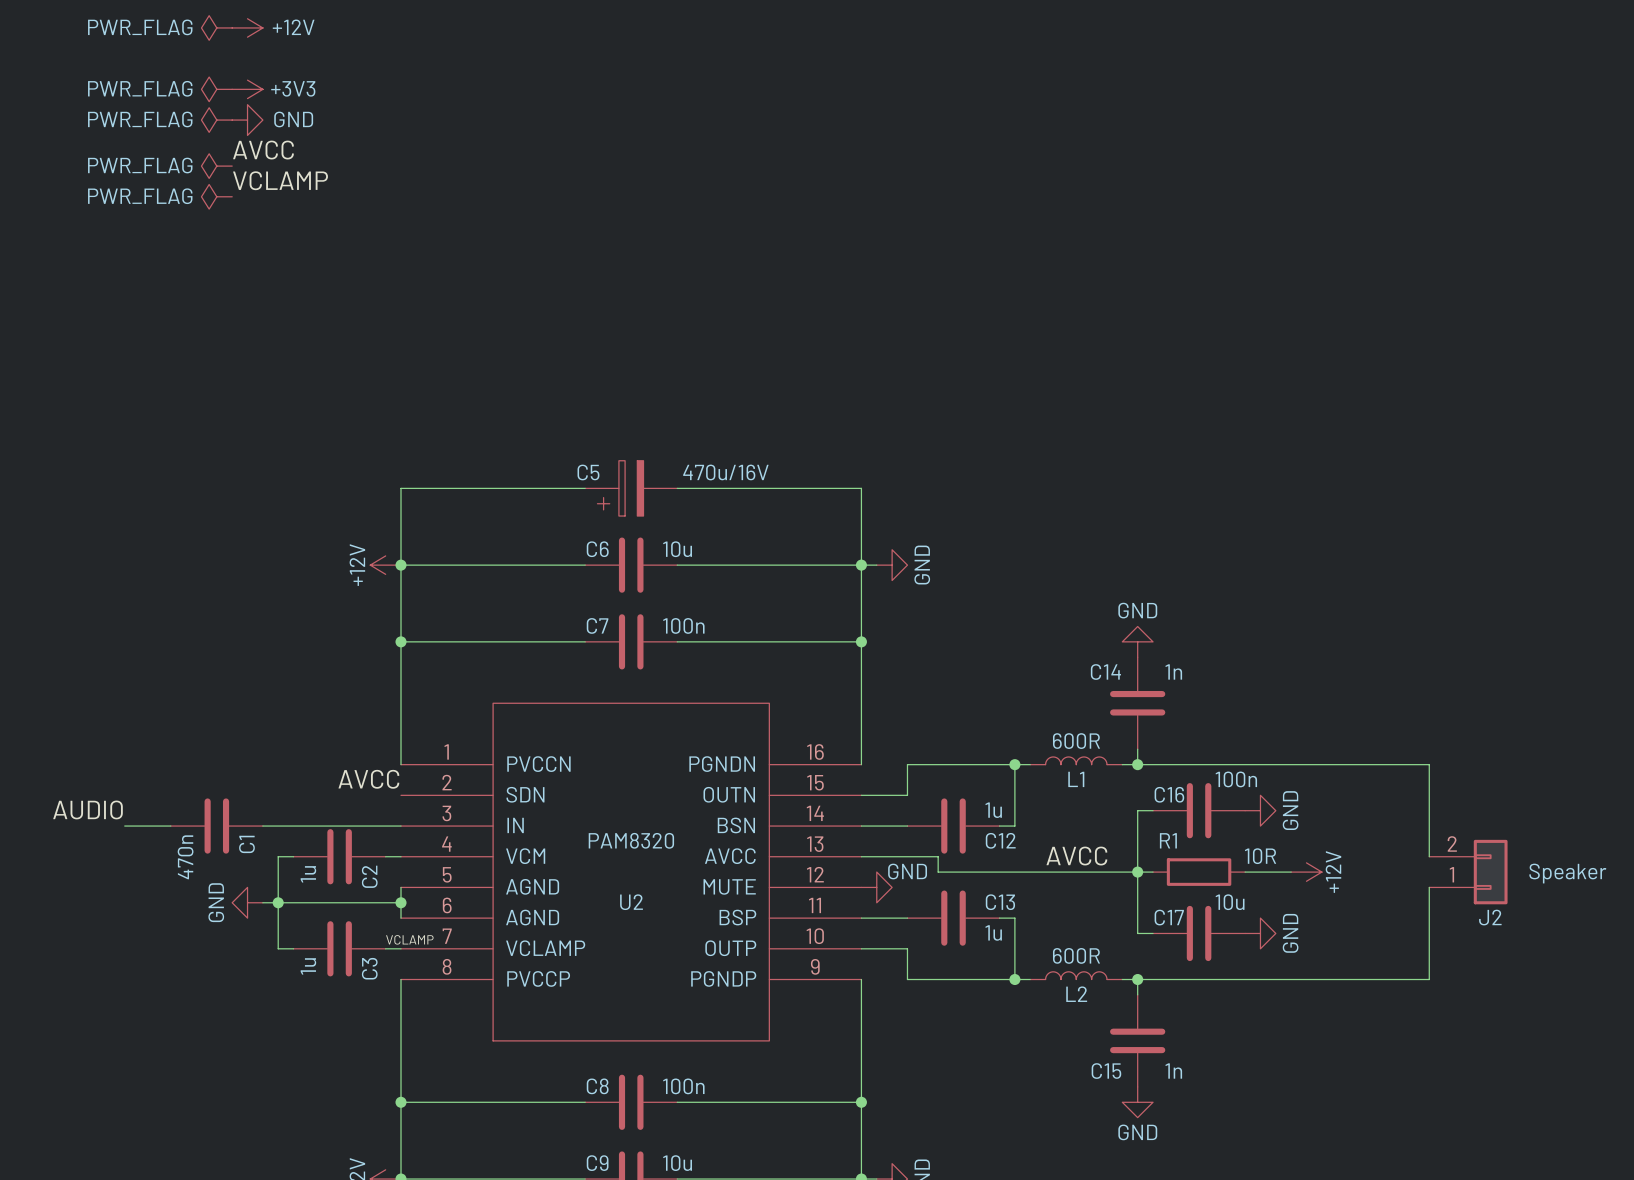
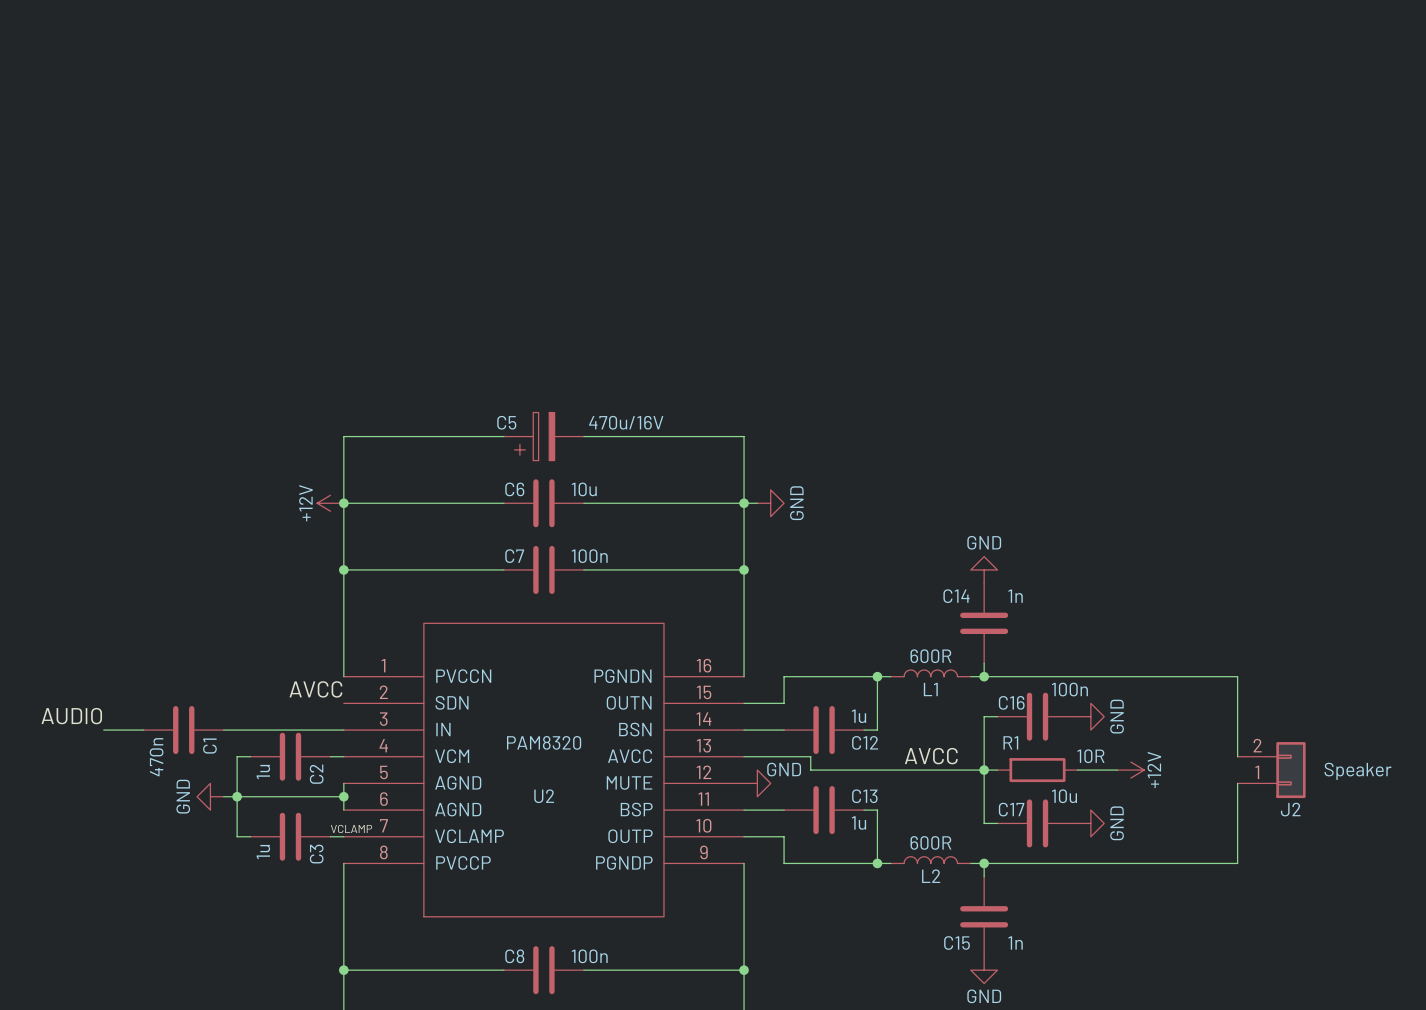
power symbol: PWR_FLAG (216, 27) -> none
power symbol: +12V (247, 27) -> none
power symbol: PWR_FLAG (216, 89) -> none
power symbol: +3V3 (247, 89) -> none
power symbol: PWR_FLAG (216, 120) -> none
power symbol: GND (247, 120) -> none
label: AVCC (263, 150) -> none
power symbol: PWR_FLAG (216, 166) -> none
label: VCLAMP (280, 180) -> none
power symbol: PWR_FLAG (216, 196) -> none

